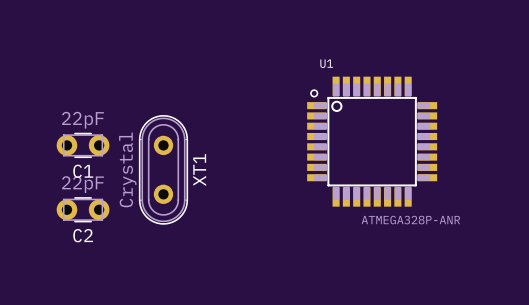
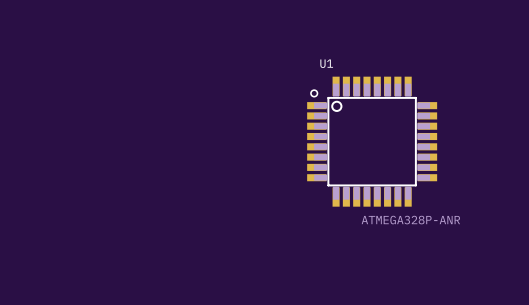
C1: 22pF (83, 145) -> none
XT1: Crystal (163, 169) -> none
C2: 22pF (83, 209) -> none

